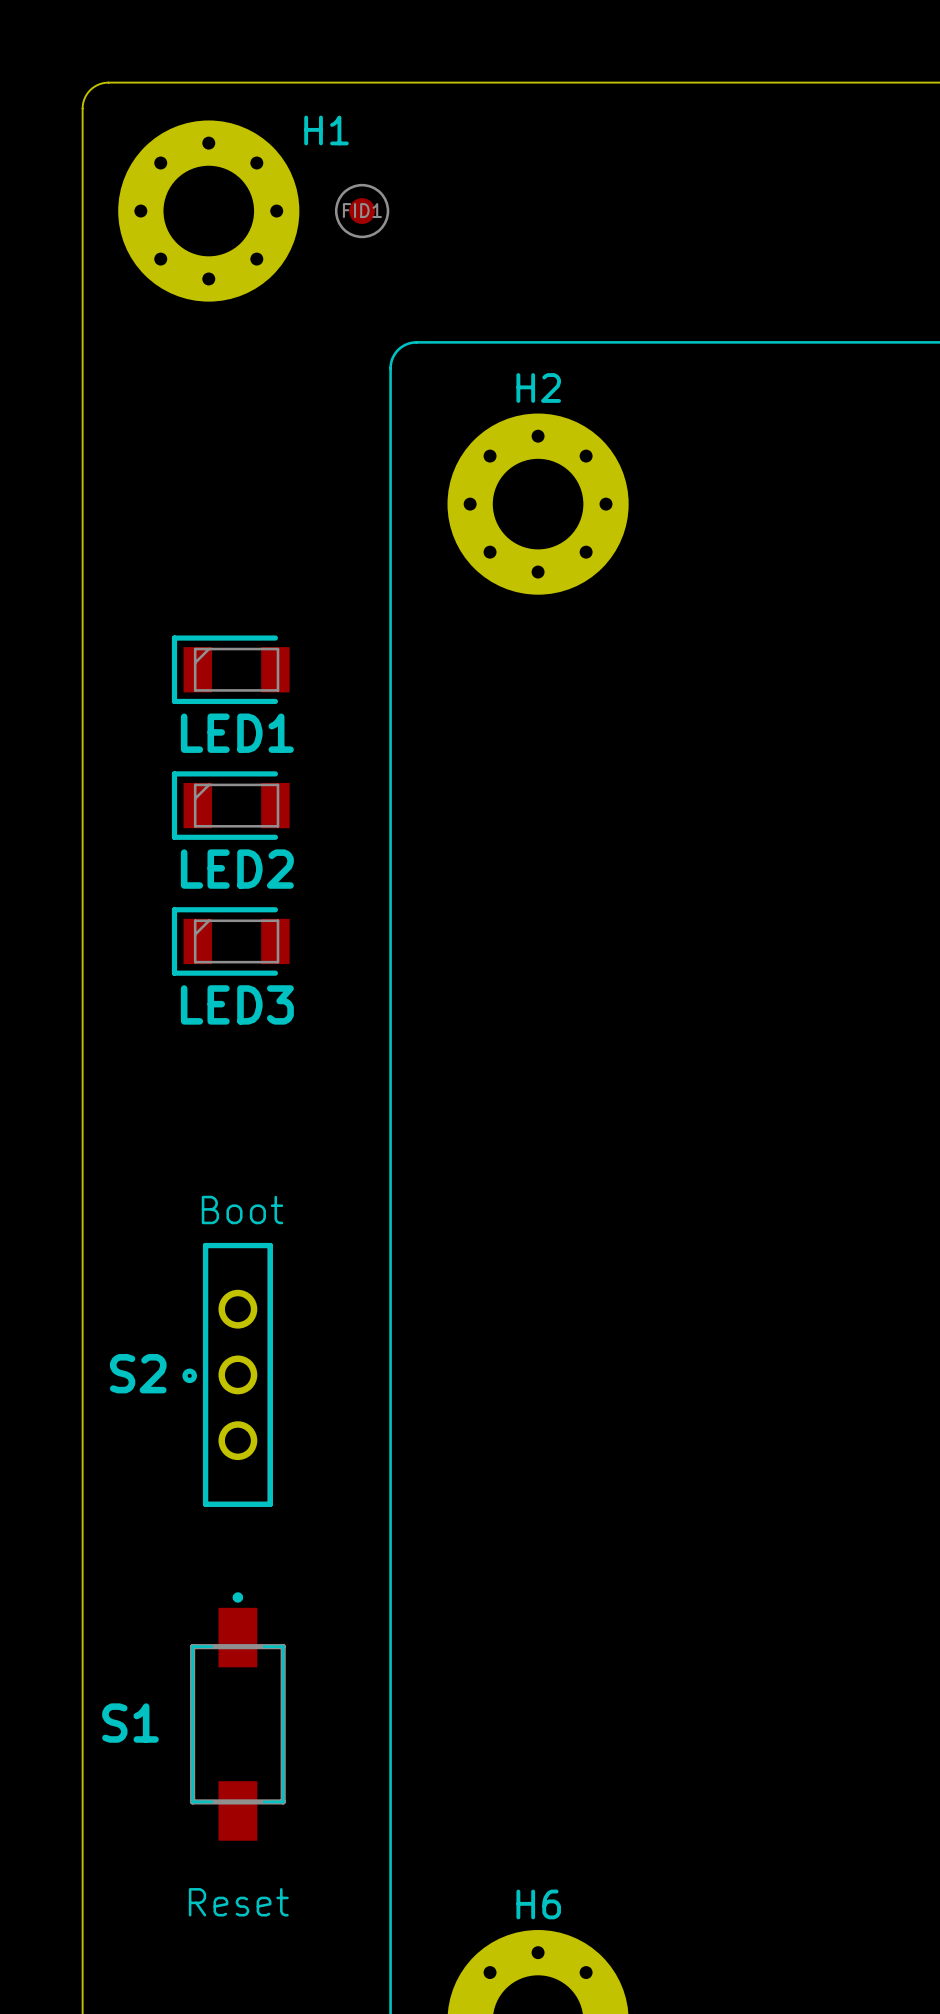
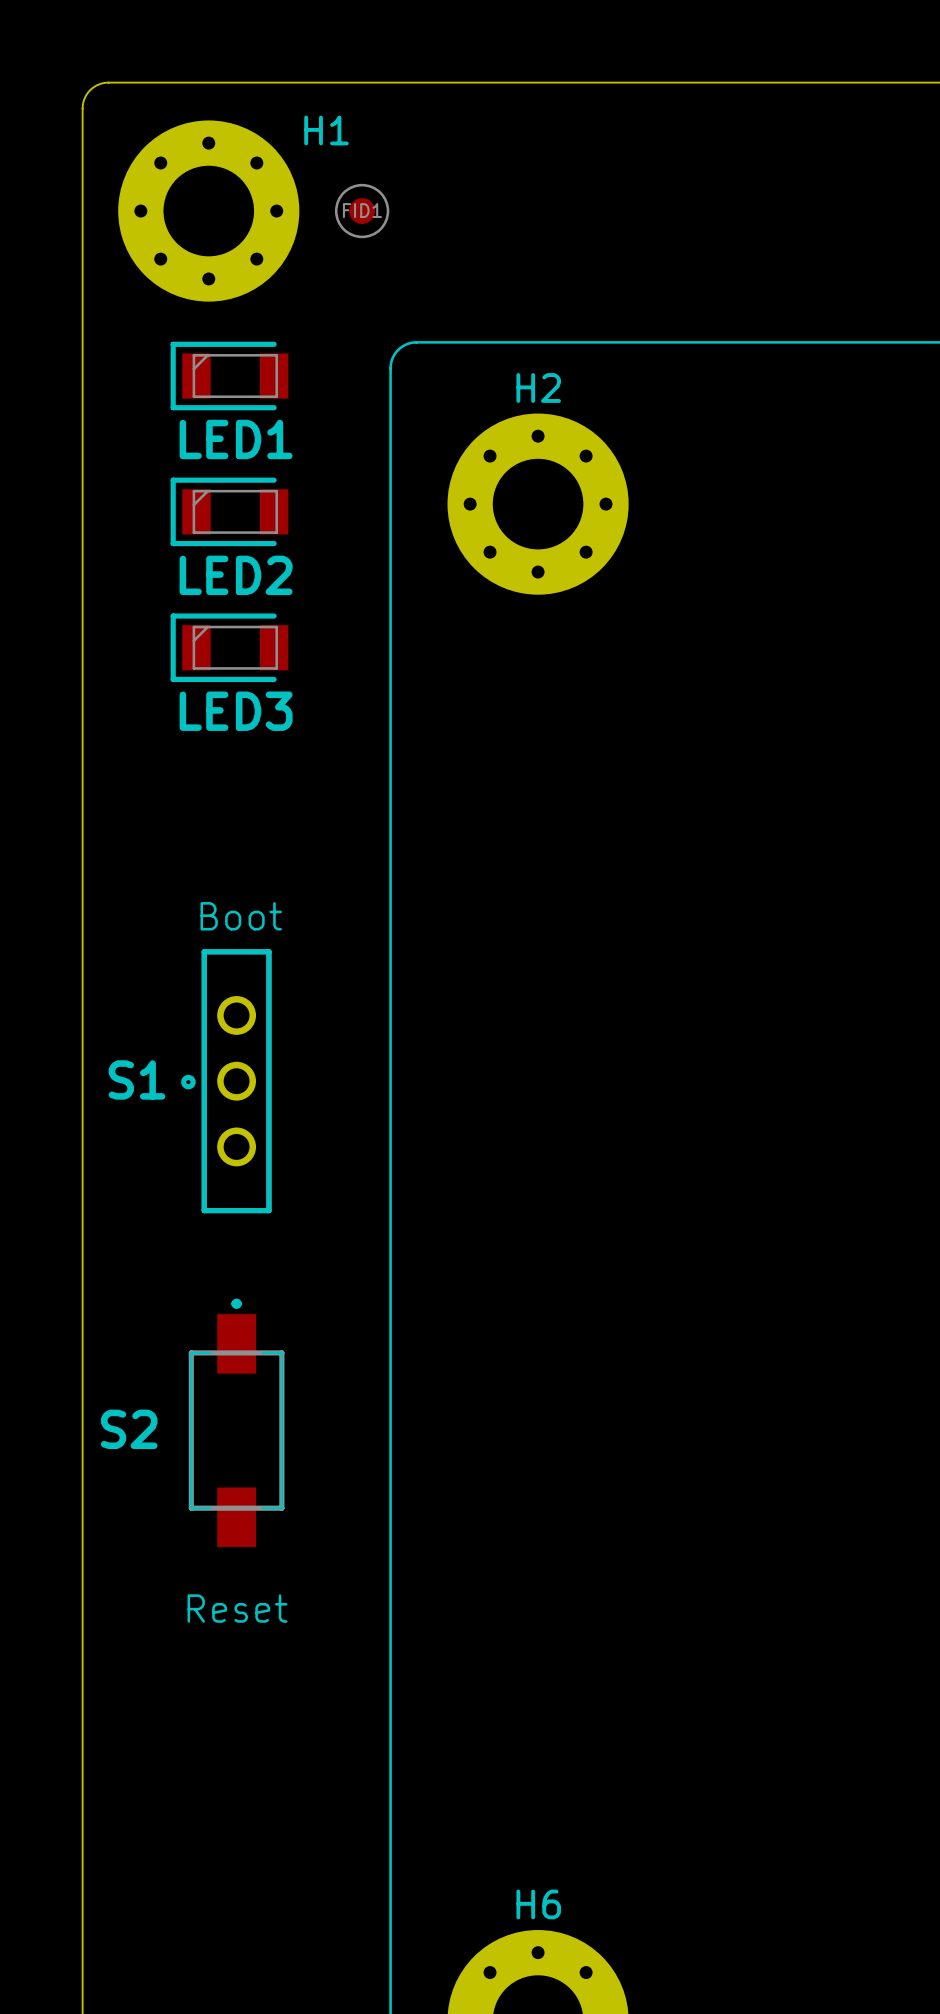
LED1 position: (230, 669) -> (229, 376)
LED2 position: (230, 805) -> (229, 511)
LED3 position: (230, 941) -> (229, 647)
text position: Boot (242, 1210) -> Boot (241, 916)
S2 footprint: [182, 1242, 273, 1507] -> [188, 1298, 285, 1548]
S1 footprint: [190, 1592, 286, 1841] -> [181, 949, 272, 1214]
text position: Reset (238, 1902) -> Reset (237, 1608)

